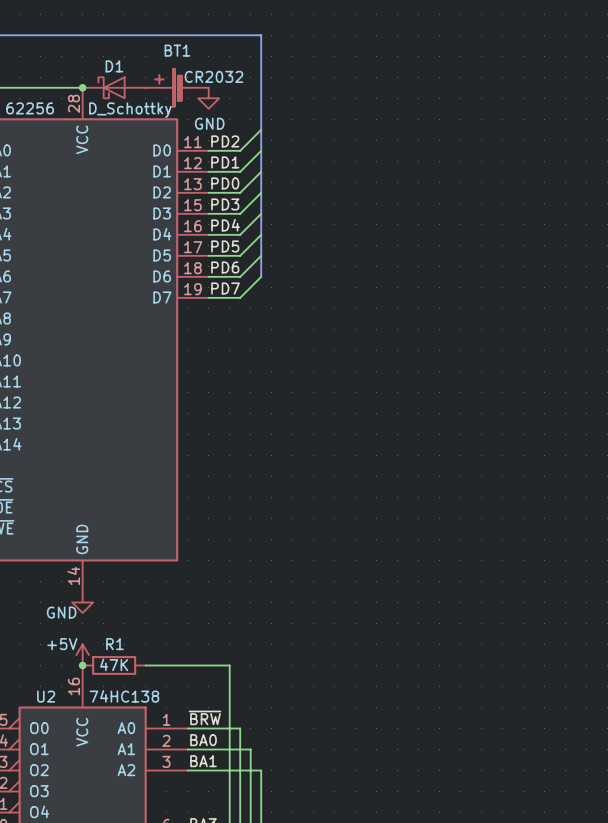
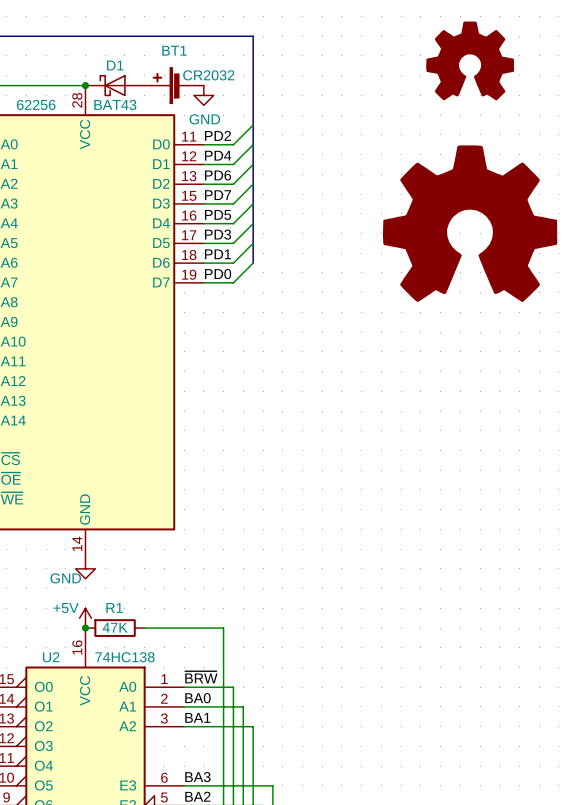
part: none -> (470, 60)
D1 value: D_Schottky (130, 110) -> BAT43 (115, 104)
label: PD1 (225, 162) -> PD4 (218, 155)
label: PD0 (225, 183) -> PD6 (218, 175)
label: PD3 (225, 204) -> PD7 (218, 195)
label: PD4 (225, 225) -> PD5 (218, 214)
part: none -> (470, 223)
label: PD5 (225, 246) -> PD3 (218, 234)
label: PD6 (225, 267) -> PD1 (218, 254)
label: PD7 (225, 288) -> PD0 (218, 274)

